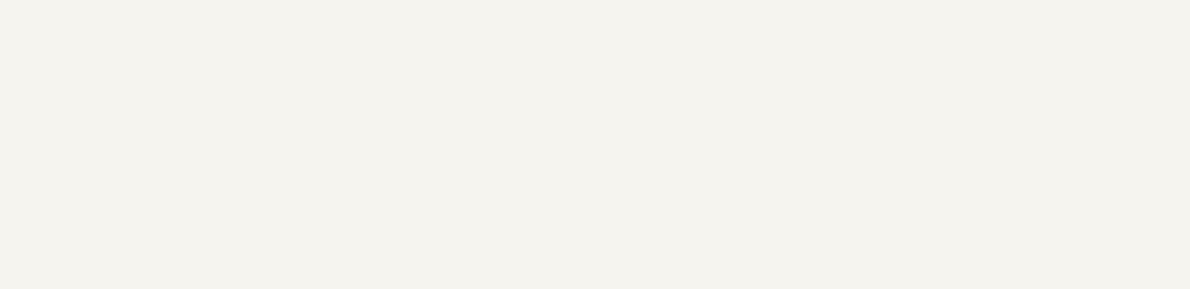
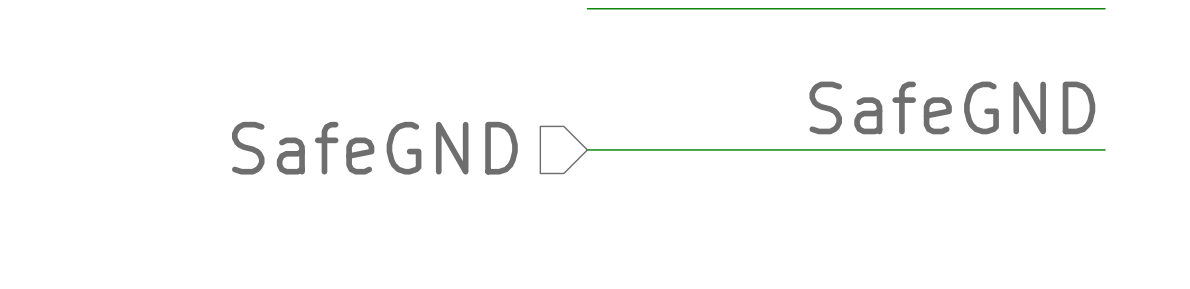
wire: none -> (587, 8) (1105, 8)
label: none -> SafeGND (952, 107)
hierarchical label: none -> SafeGND (374, 148)
wire: none -> (587, 149) (1105, 149)

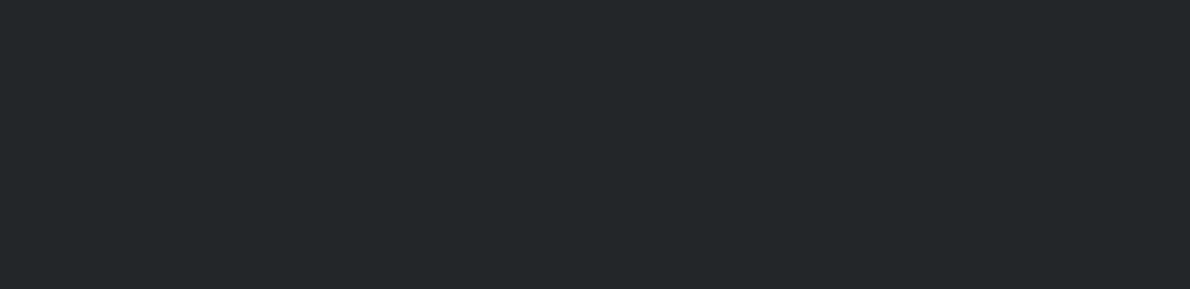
wire: (587, 8) (1105, 8) -> none
label: SafeGND (952, 107) -> none
hierarchical label: SafeGND (374, 148) -> none
wire: (587, 149) (1105, 149) -> none

